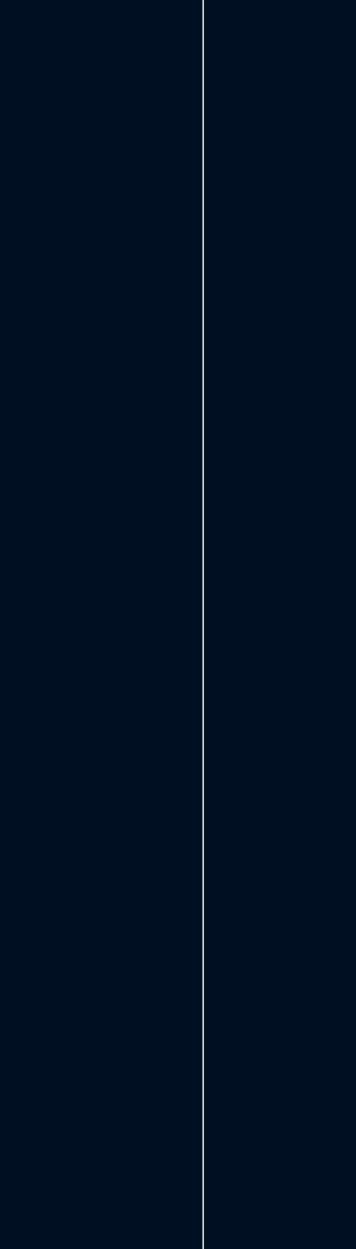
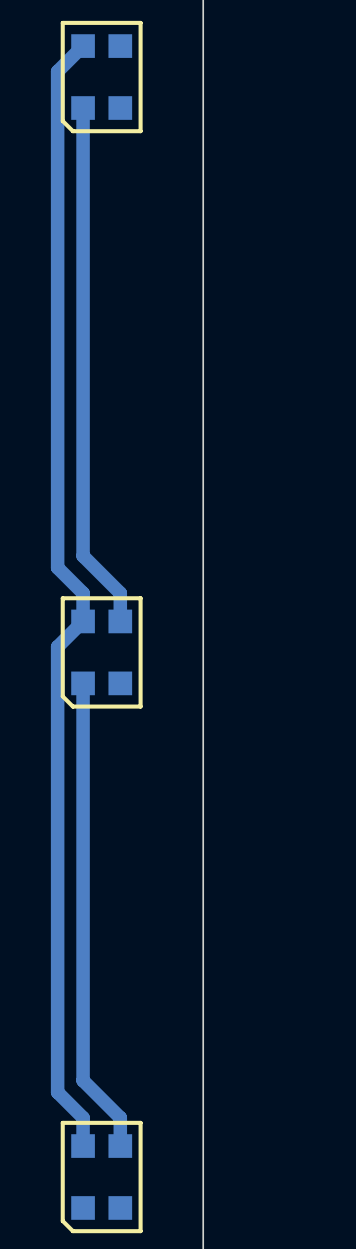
track: none -> (83, 46) (57, 71) (57, 567) (83, 593) (83, 621) (57, 646) (57, 1092) (83, 1117) (83, 1146)
part: none -> (101, 77)
track: none -> (83, 108) (83, 555) (120, 593) (120, 621)
part: none -> (101, 652)
track: none -> (83, 683) (83, 1080) (120, 1117) (120, 1146)
part: none -> (101, 1177)

